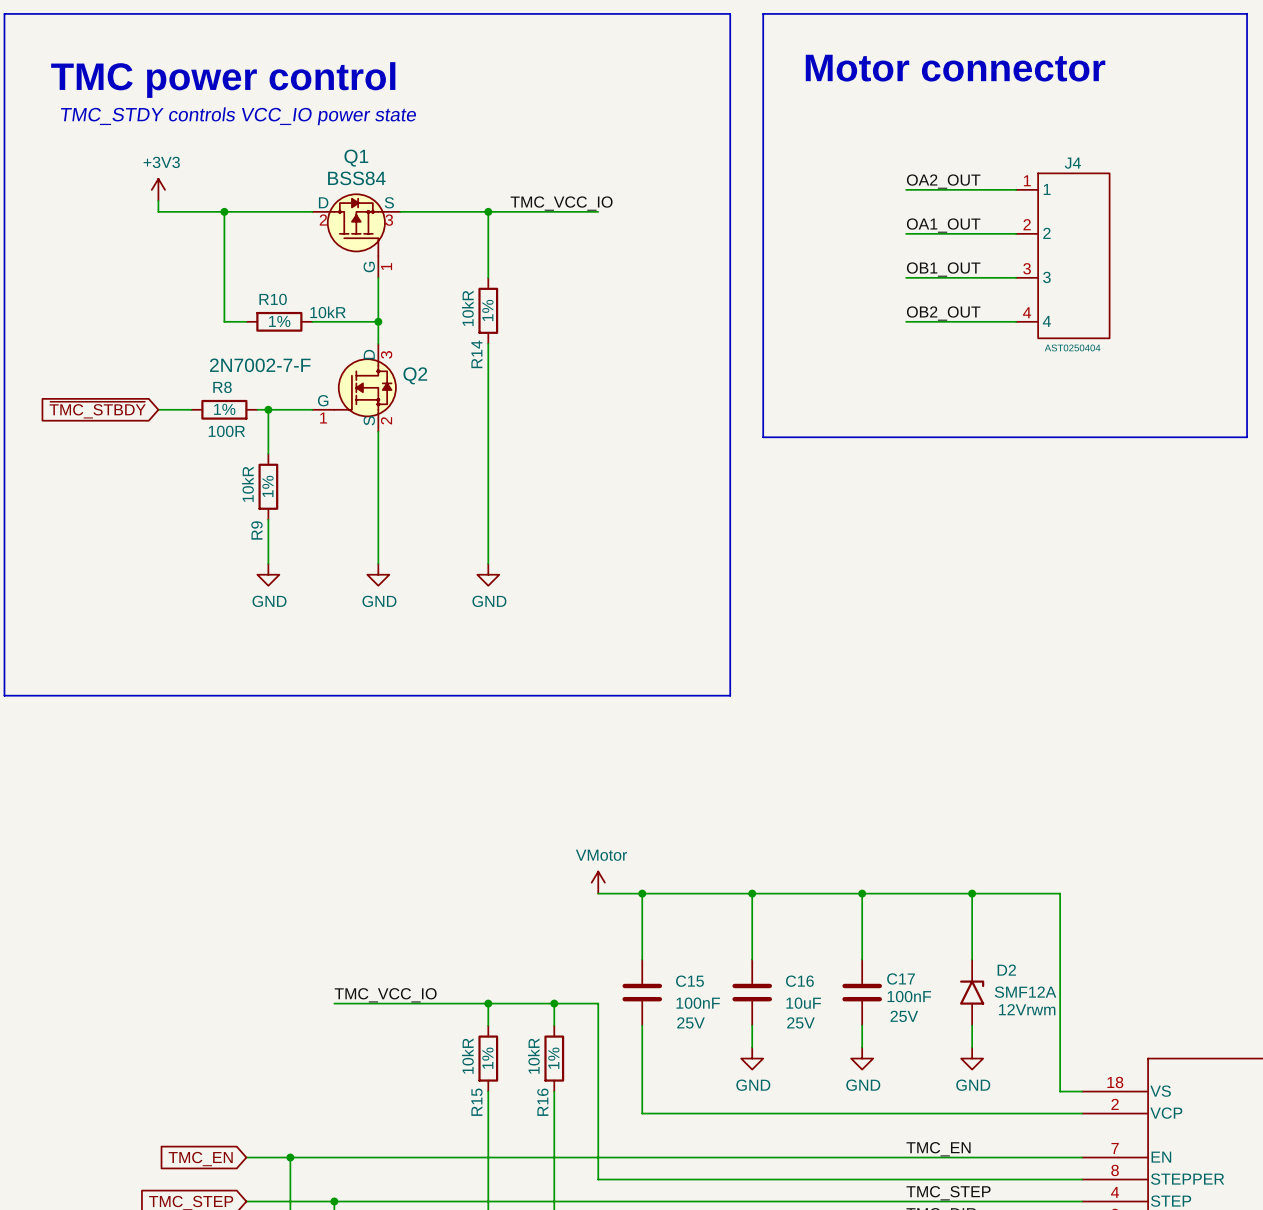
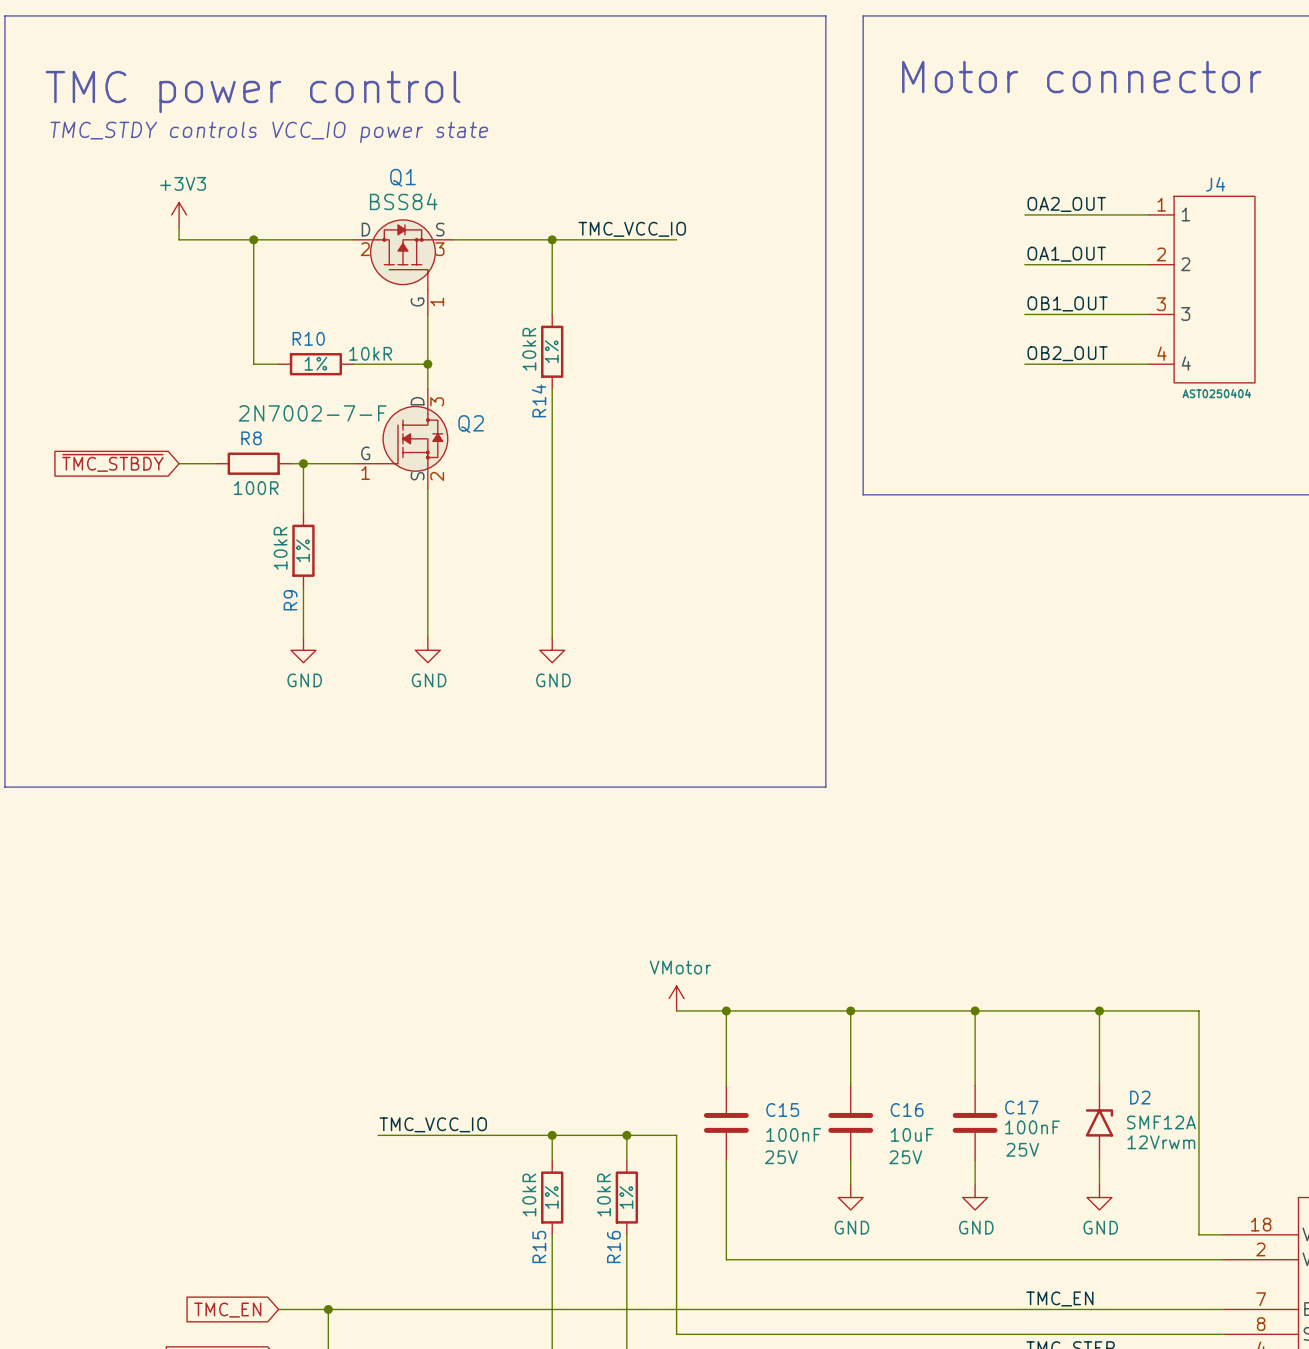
R8 text: 1% (224, 409) -> none

